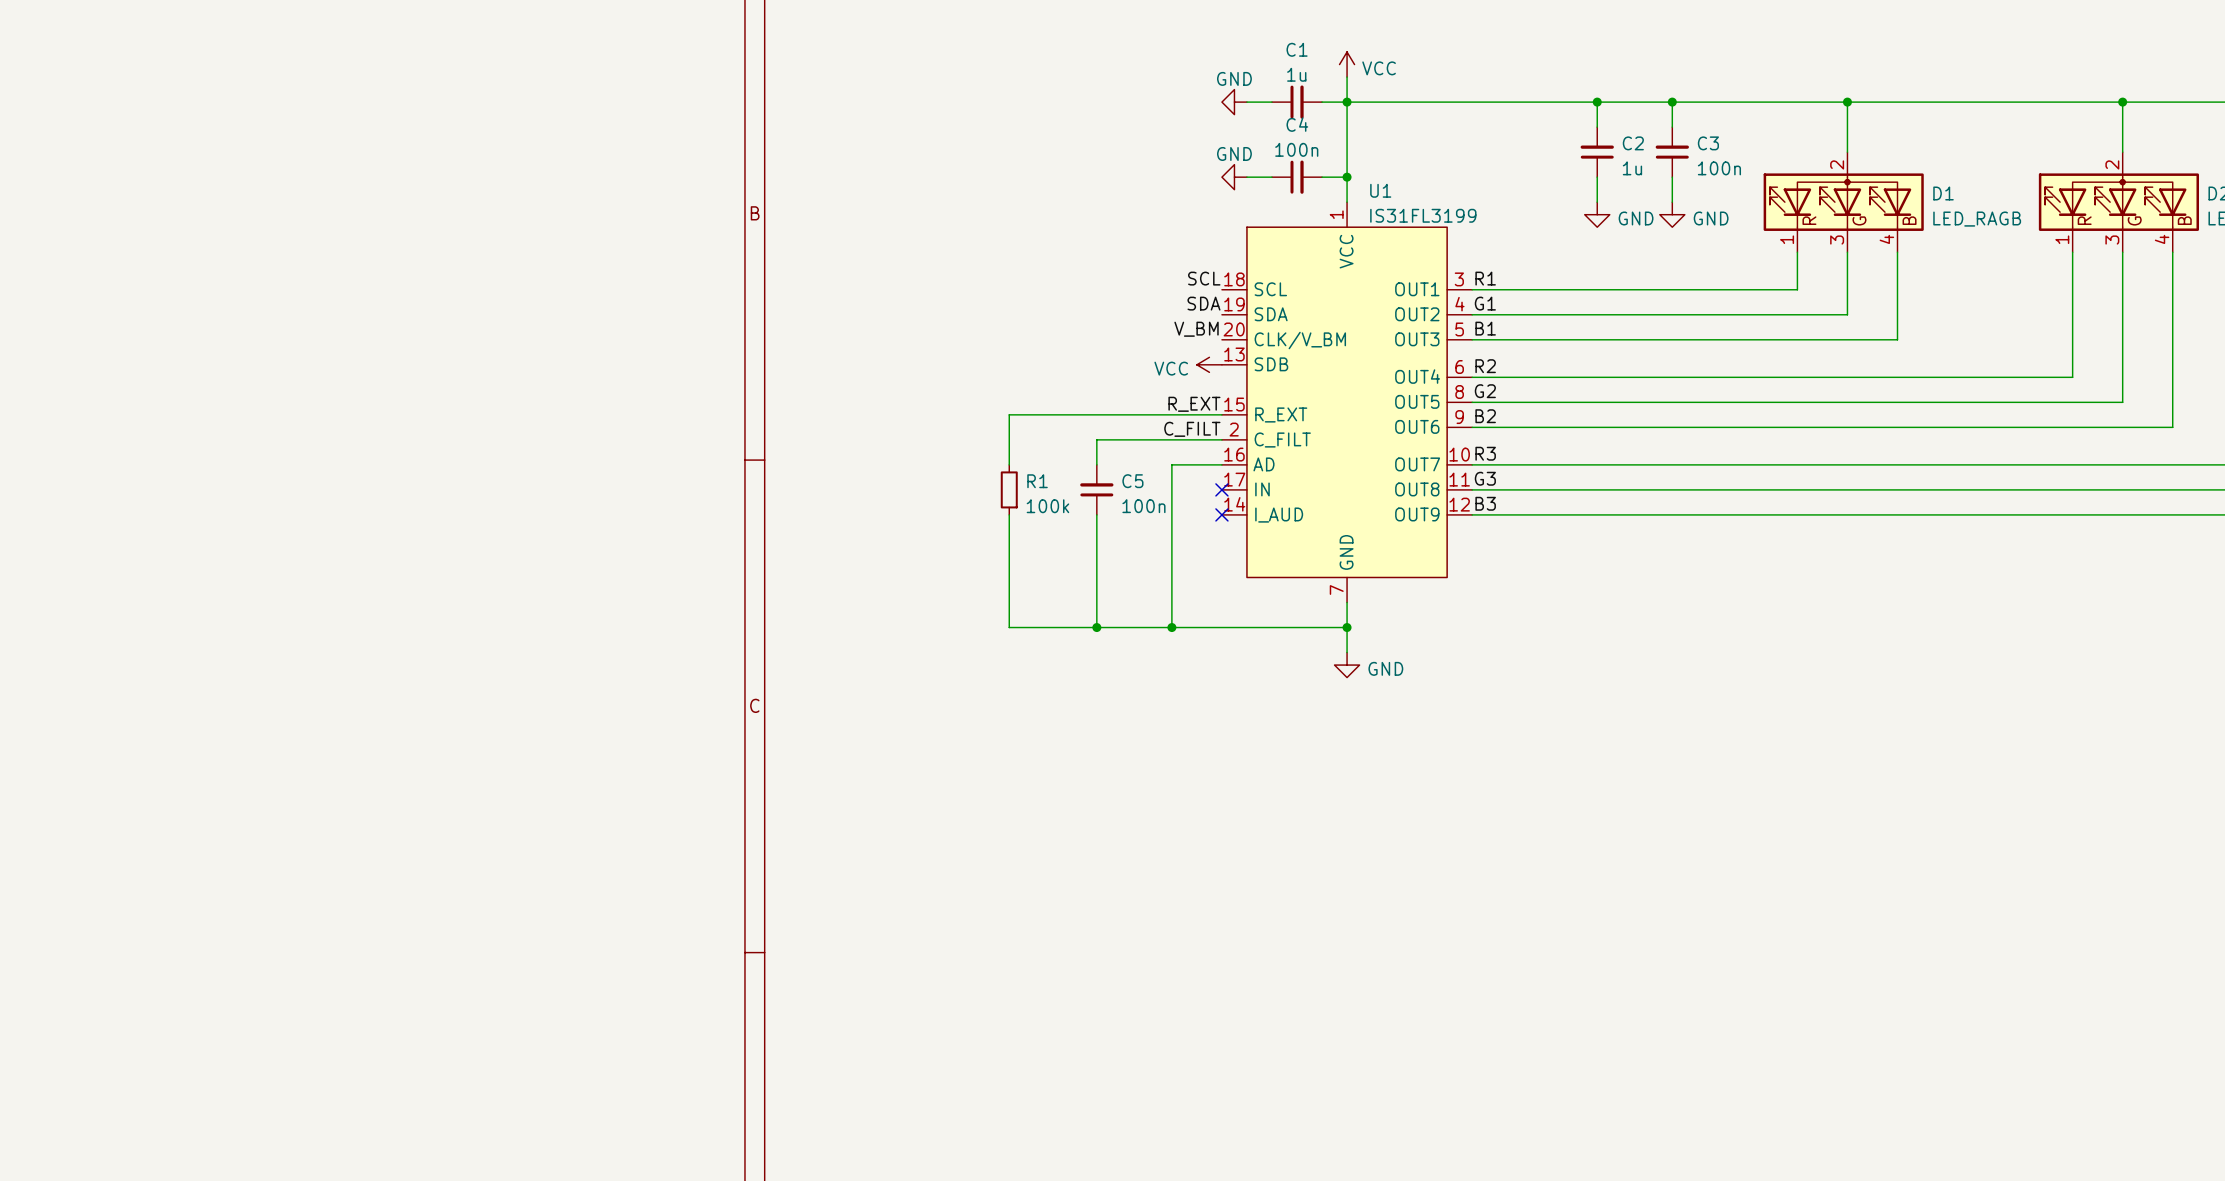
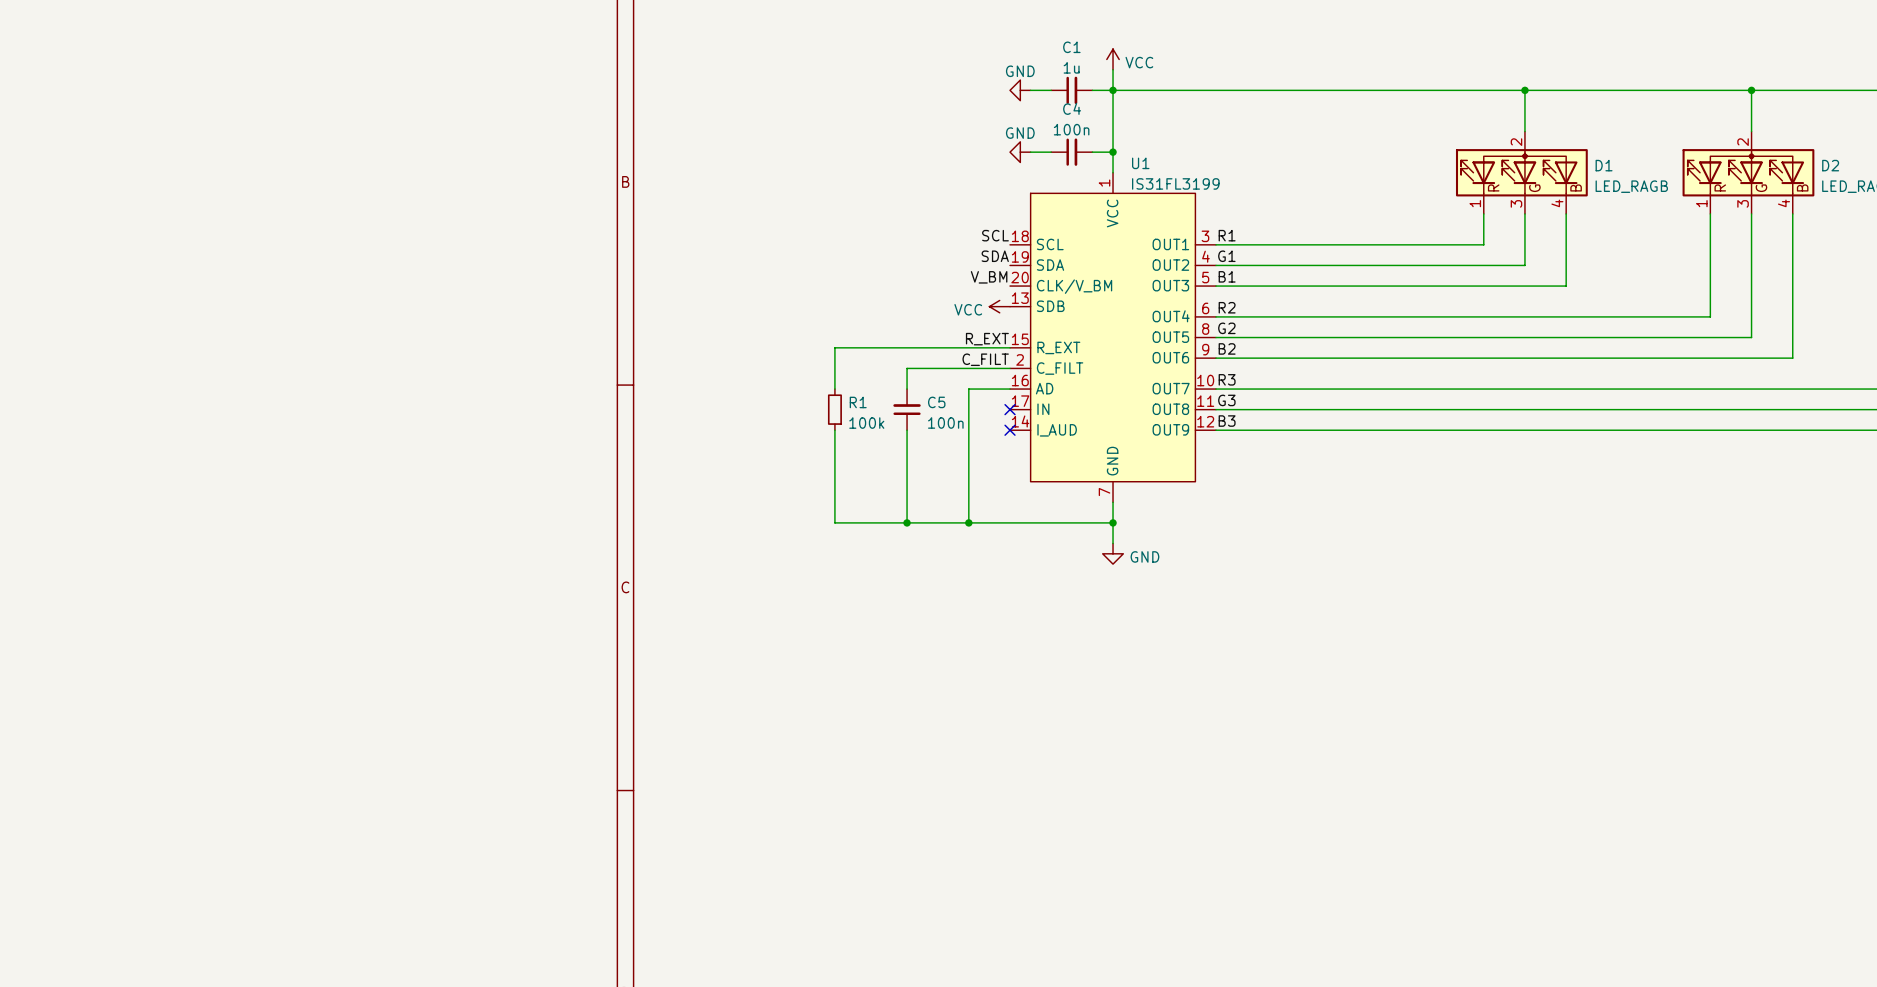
wire: (1597, 102) (1597, 127) -> none
junction: (1597, 102) -> none
wire: (1672, 102) (1672, 127) -> none
junction: (1672, 102) -> none
C2: 1u (1597, 152) -> none
C3: 100n (1672, 152) -> none
wire: (1597, 177) (1597, 202) -> none
wire: (1672, 177) (1672, 202) -> none
power symbol: GND (1597, 214) -> none
power symbol: GND (1672, 214) -> none

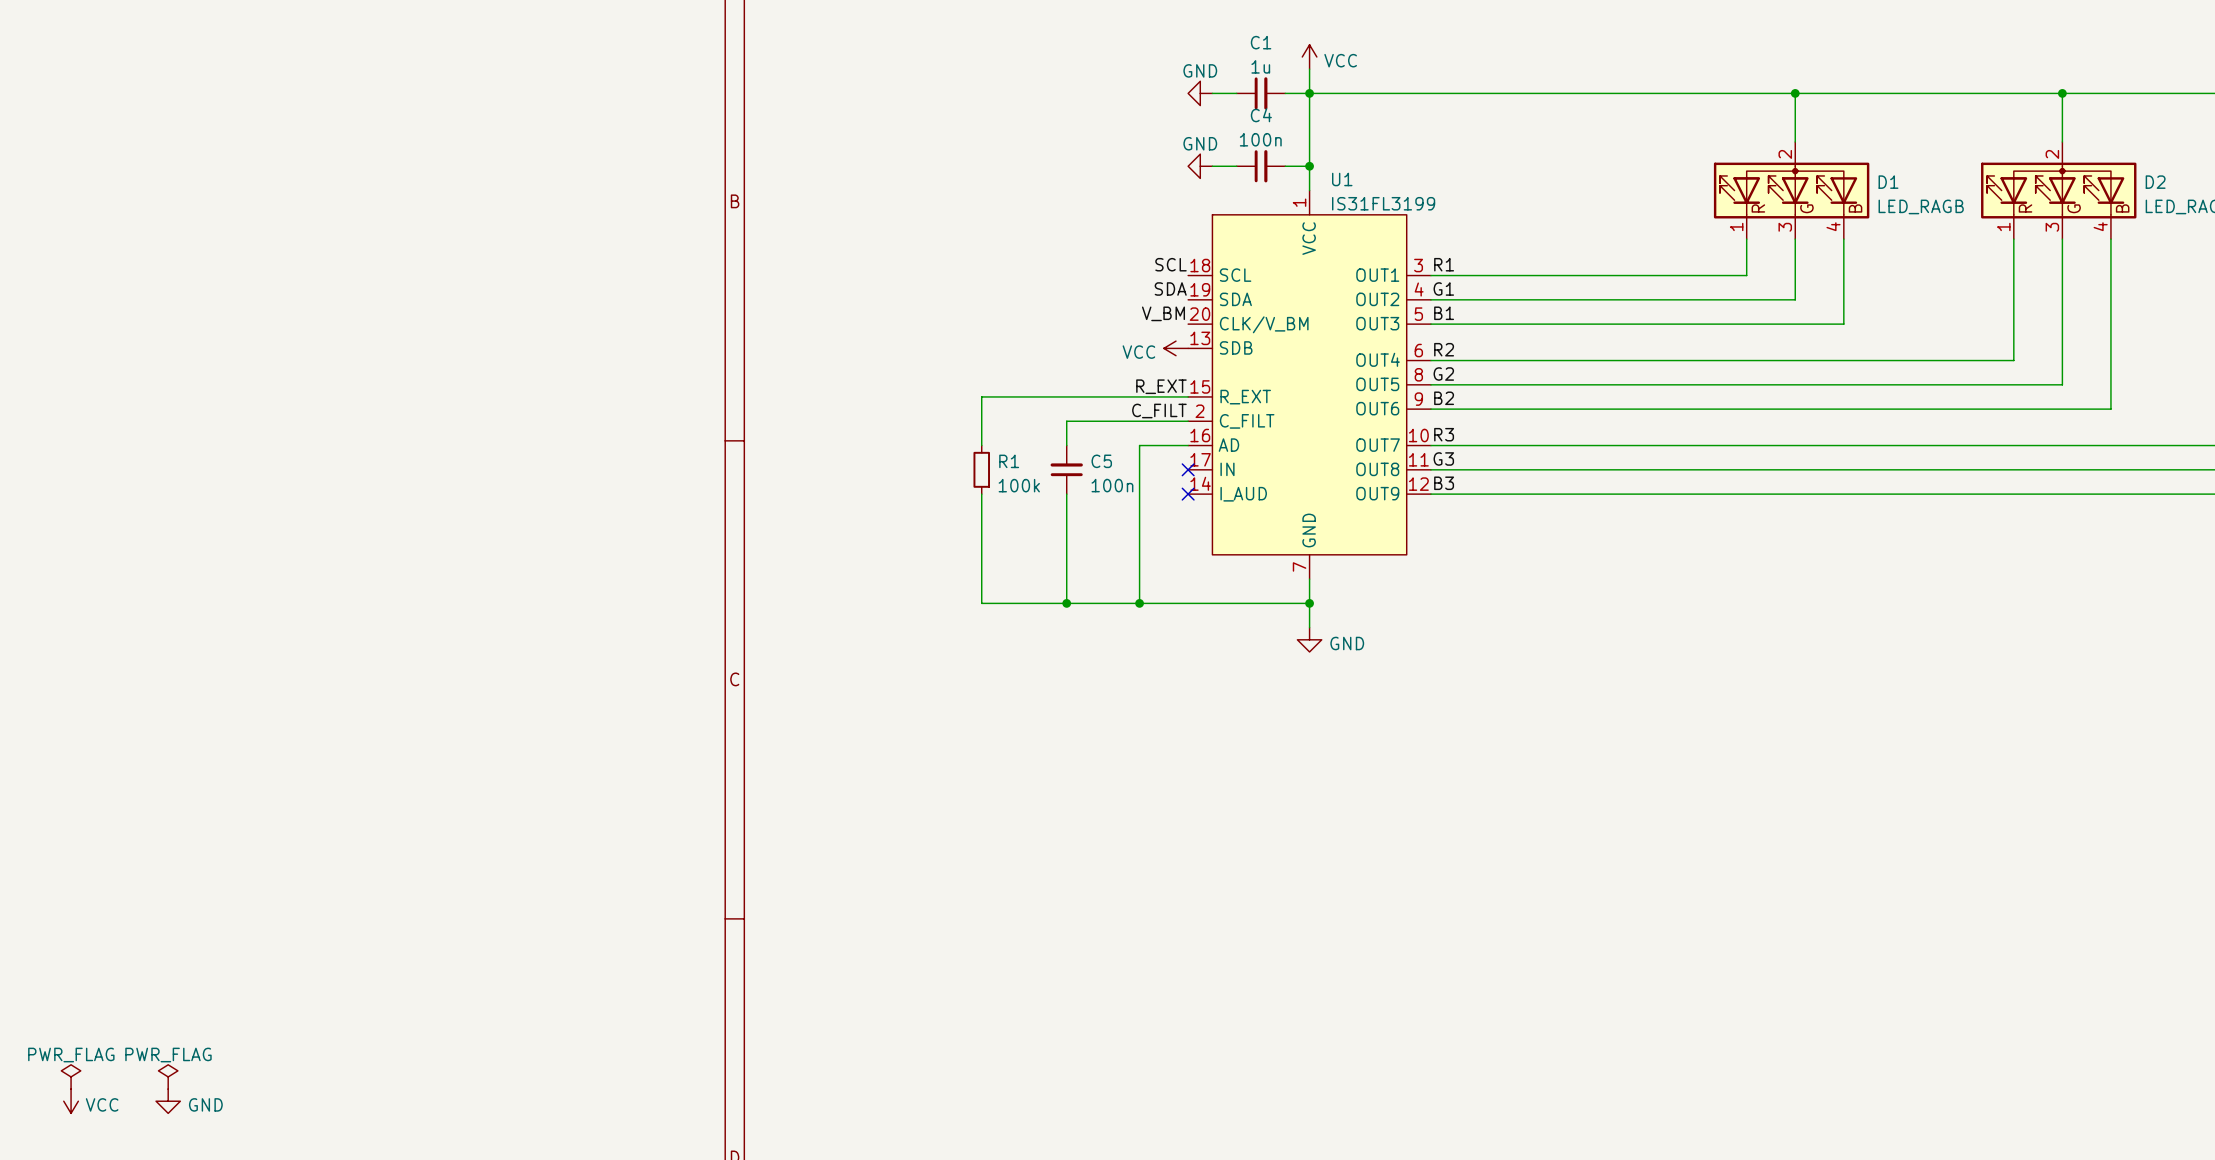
power symbol: none -> PWR_FLAG (71, 1076)
power symbol: none -> PWR_FLAG (168, 1076)
power symbol: none -> VCC (71, 1101)
power symbol: none -> GND (168, 1101)

